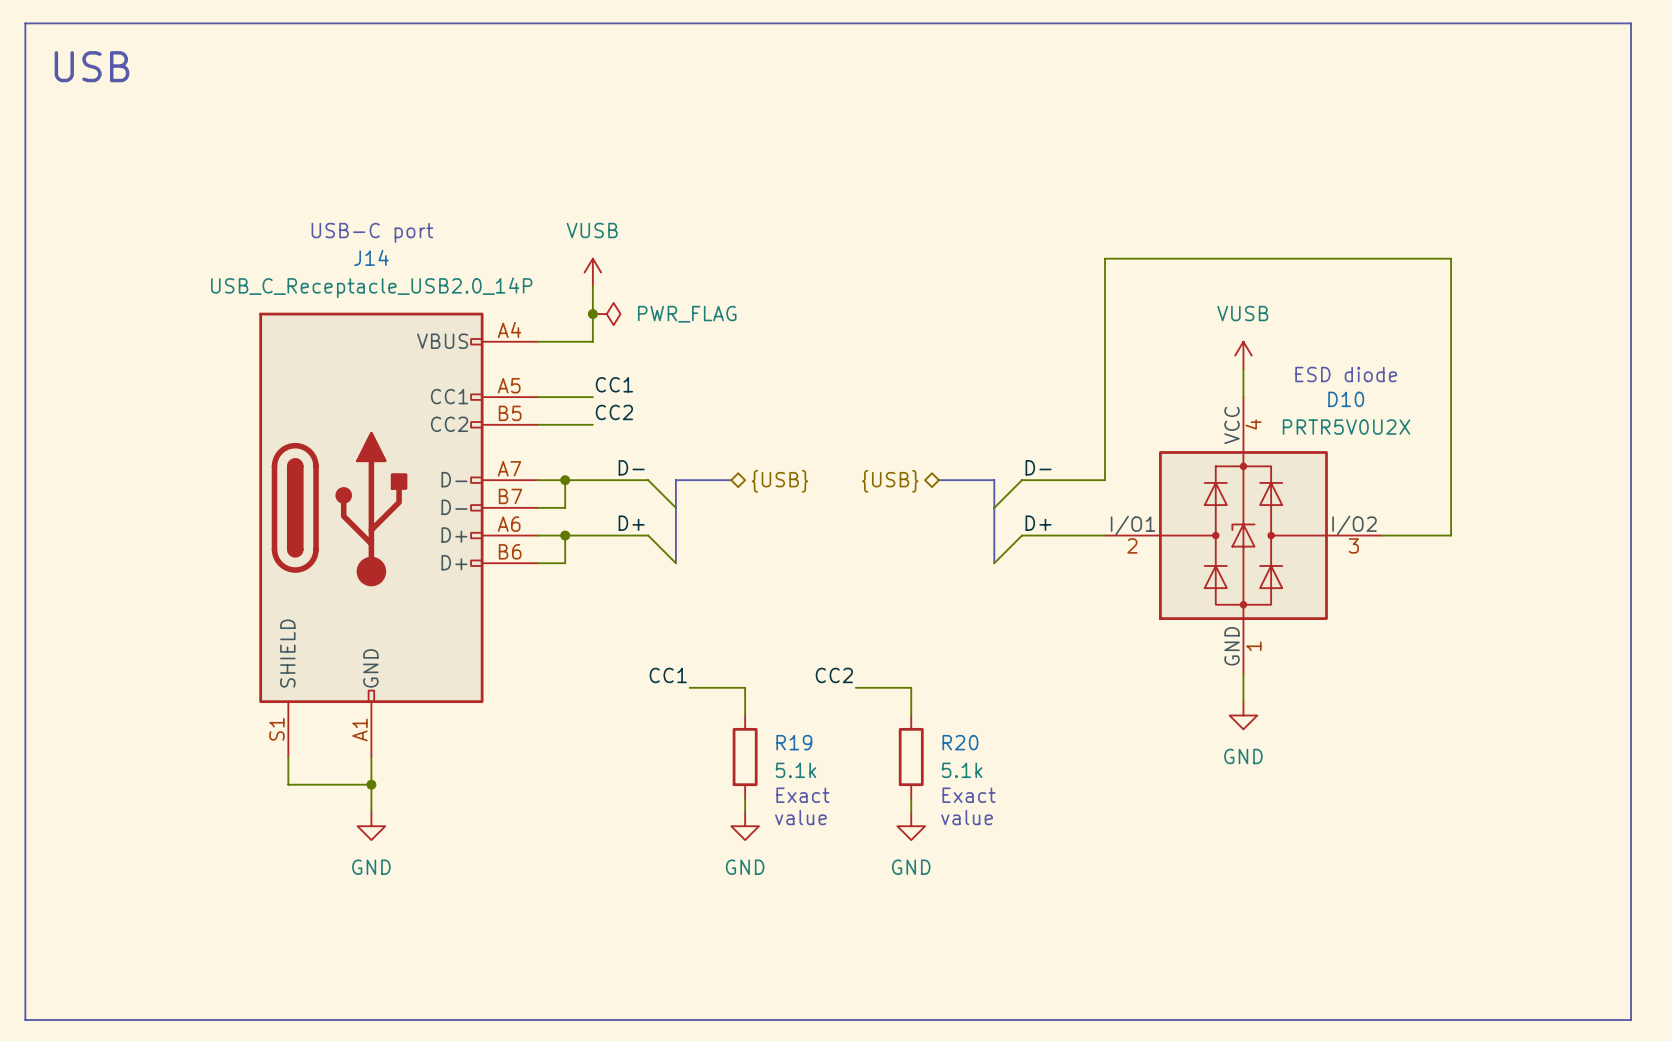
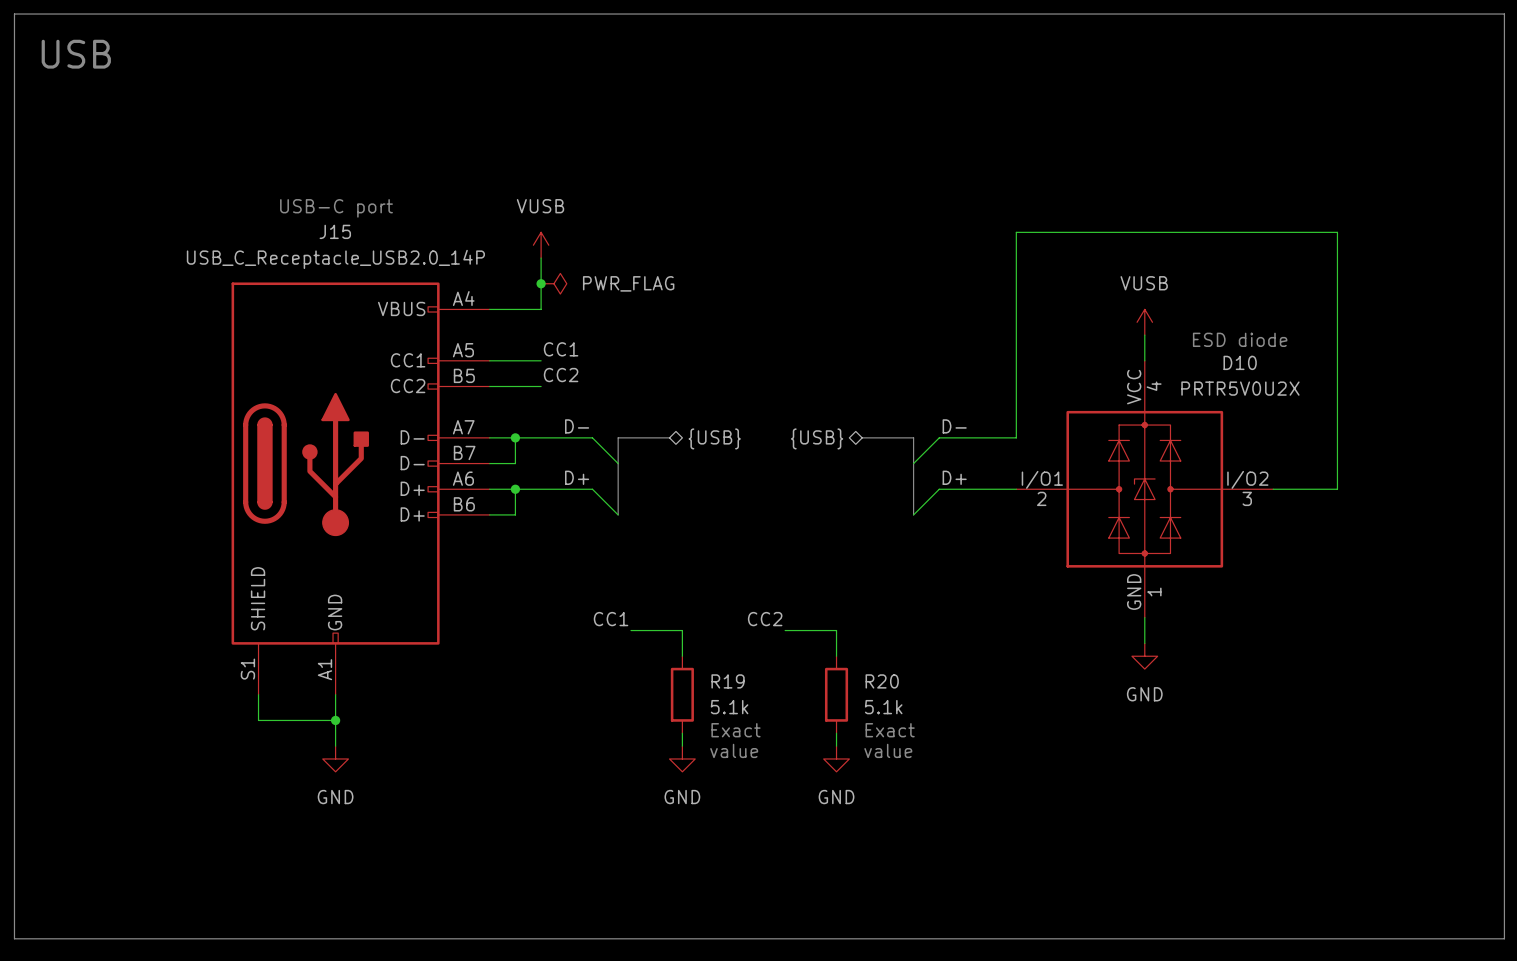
J14 name: J14 (371, 257) -> J15 (335, 231)

